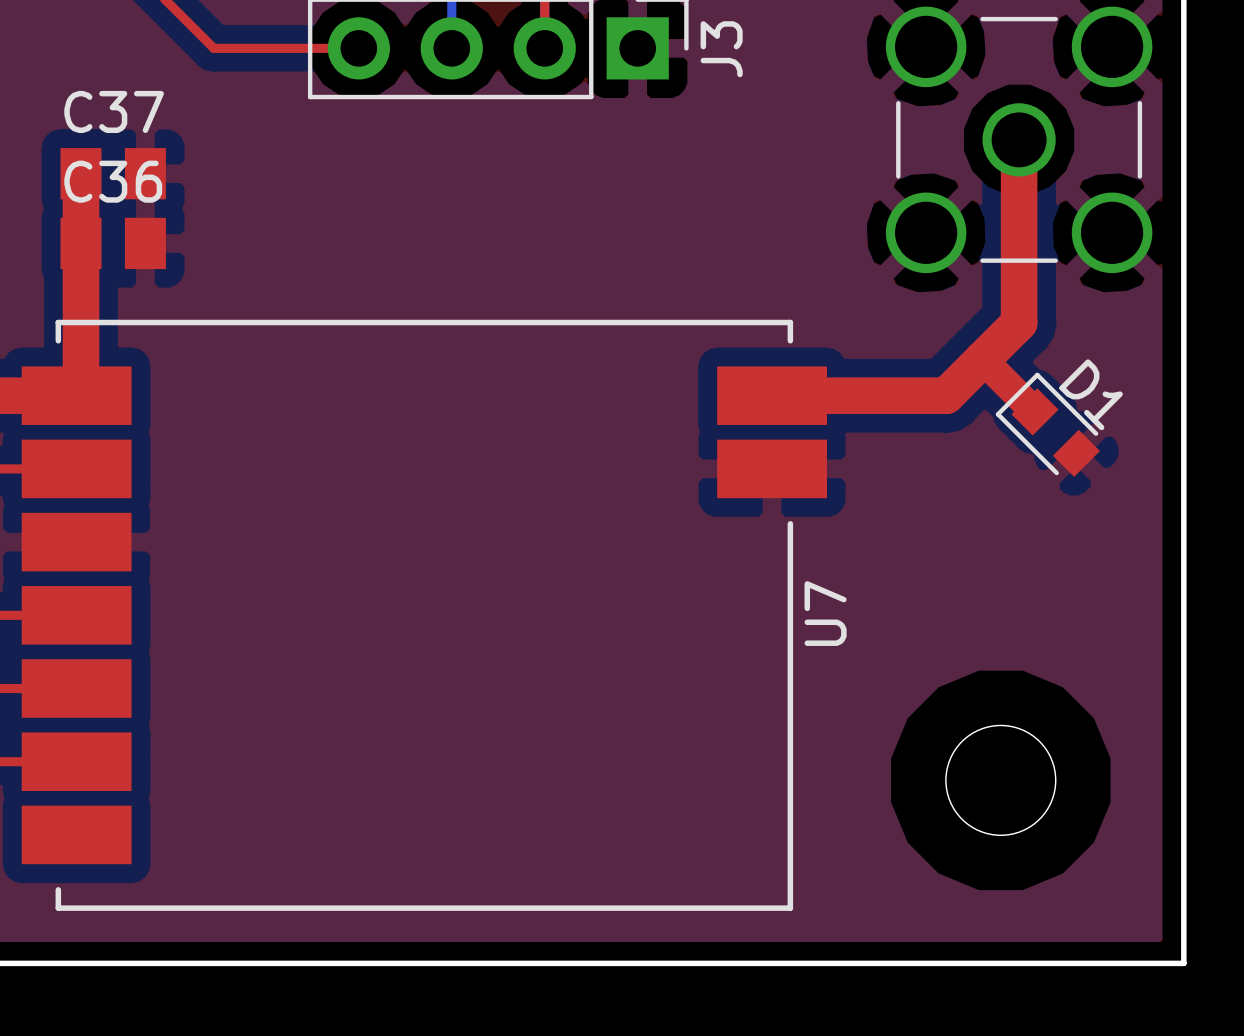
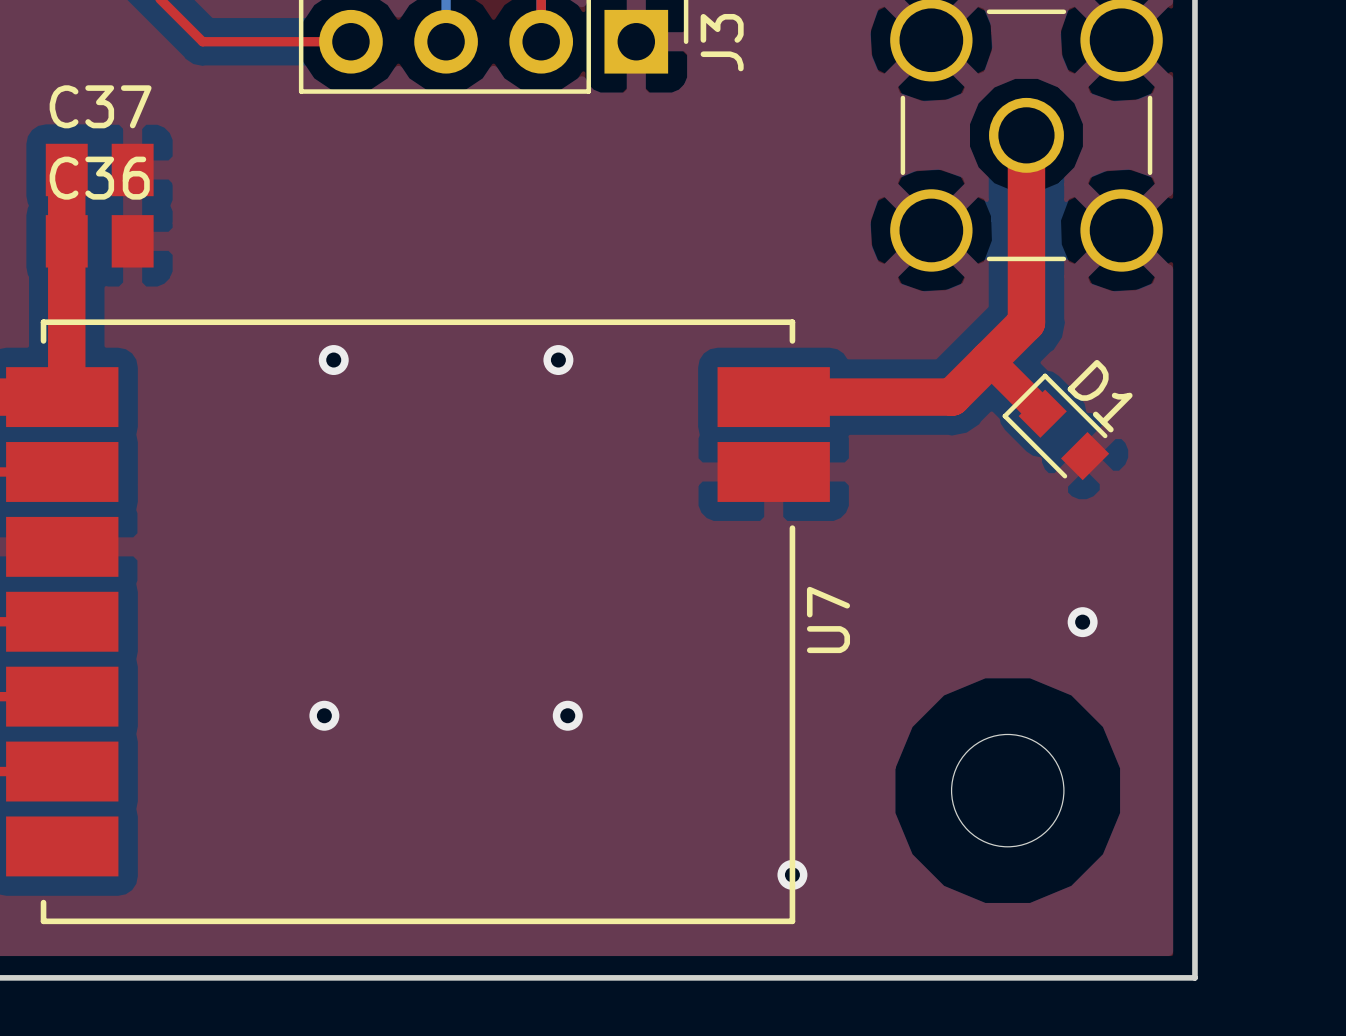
via: none -> (333, 360)
via: none -> (558, 360)
via: none -> (1082, 622)
via: none -> (324, 715)
via: none -> (567, 715)
via: none -> (792, 874)

